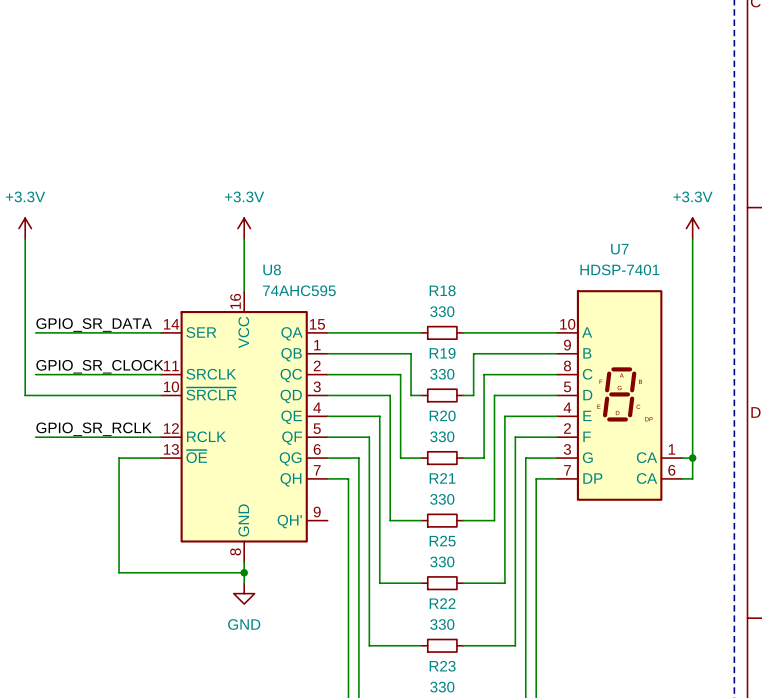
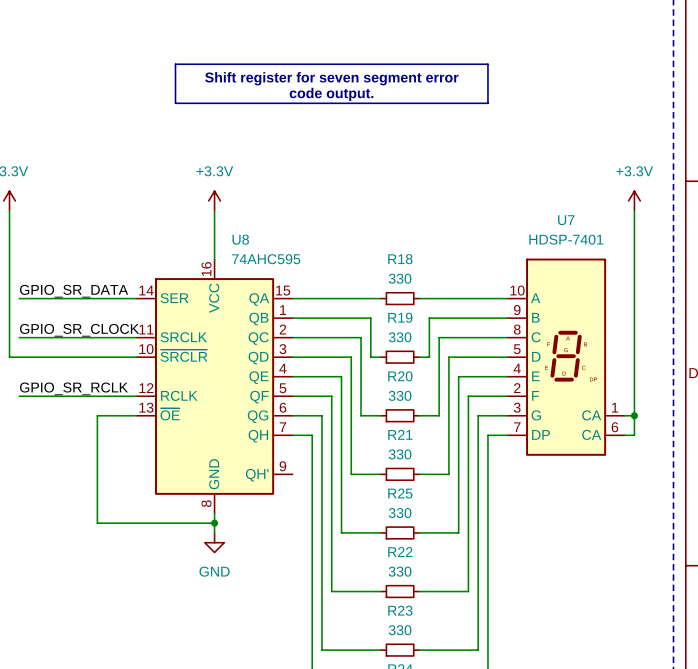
line: none -> (175, 64) (487, 64) (487, 103) (175, 103) (175, 64)
text: none -> Shift register for seven segment error (331, 78)
text: none -> code output. (331, 94)

